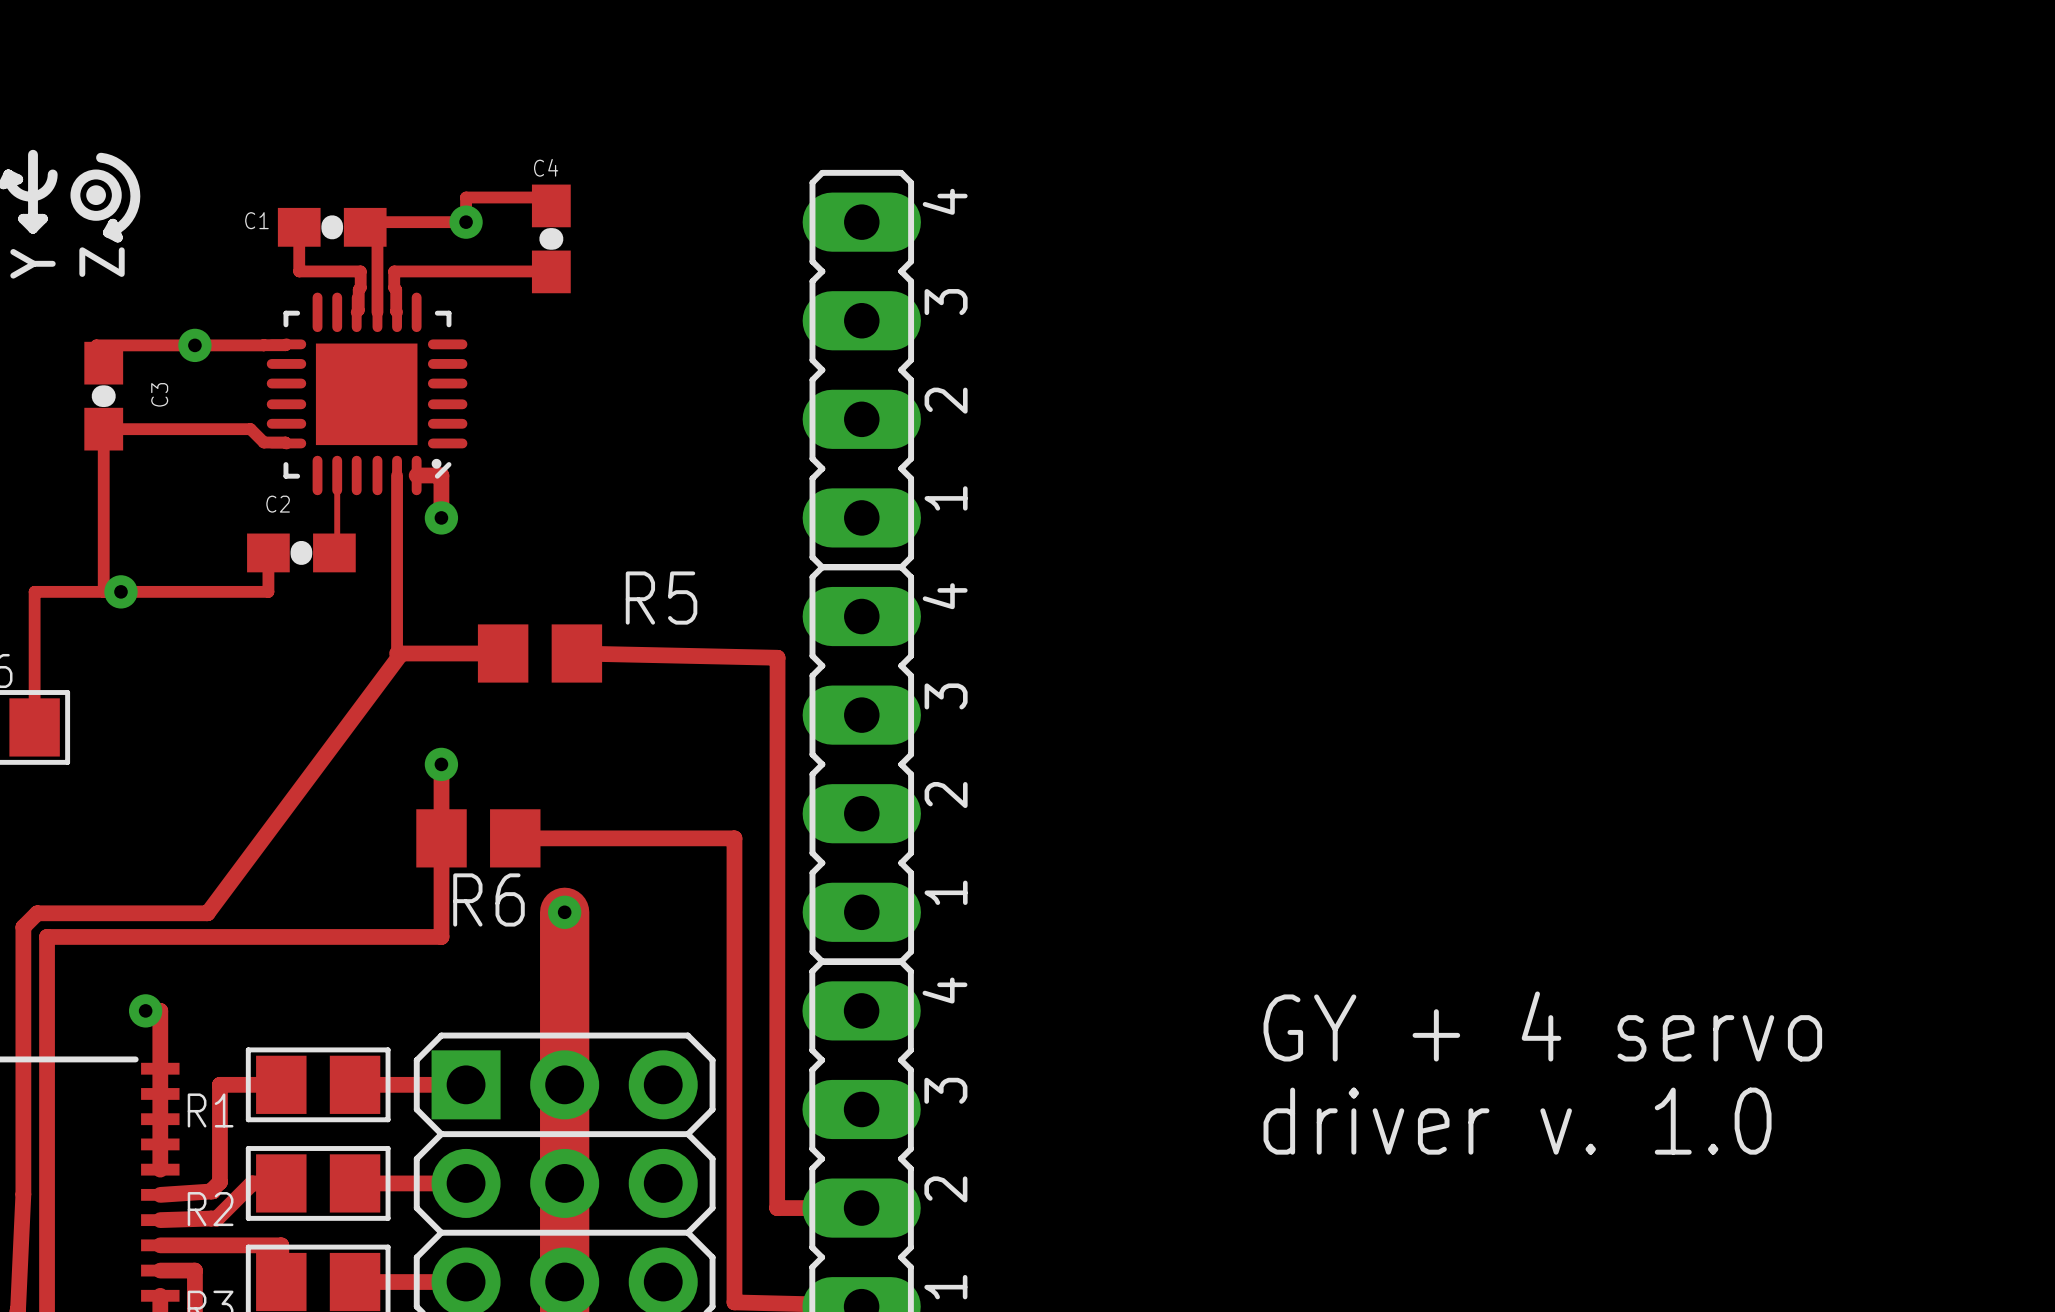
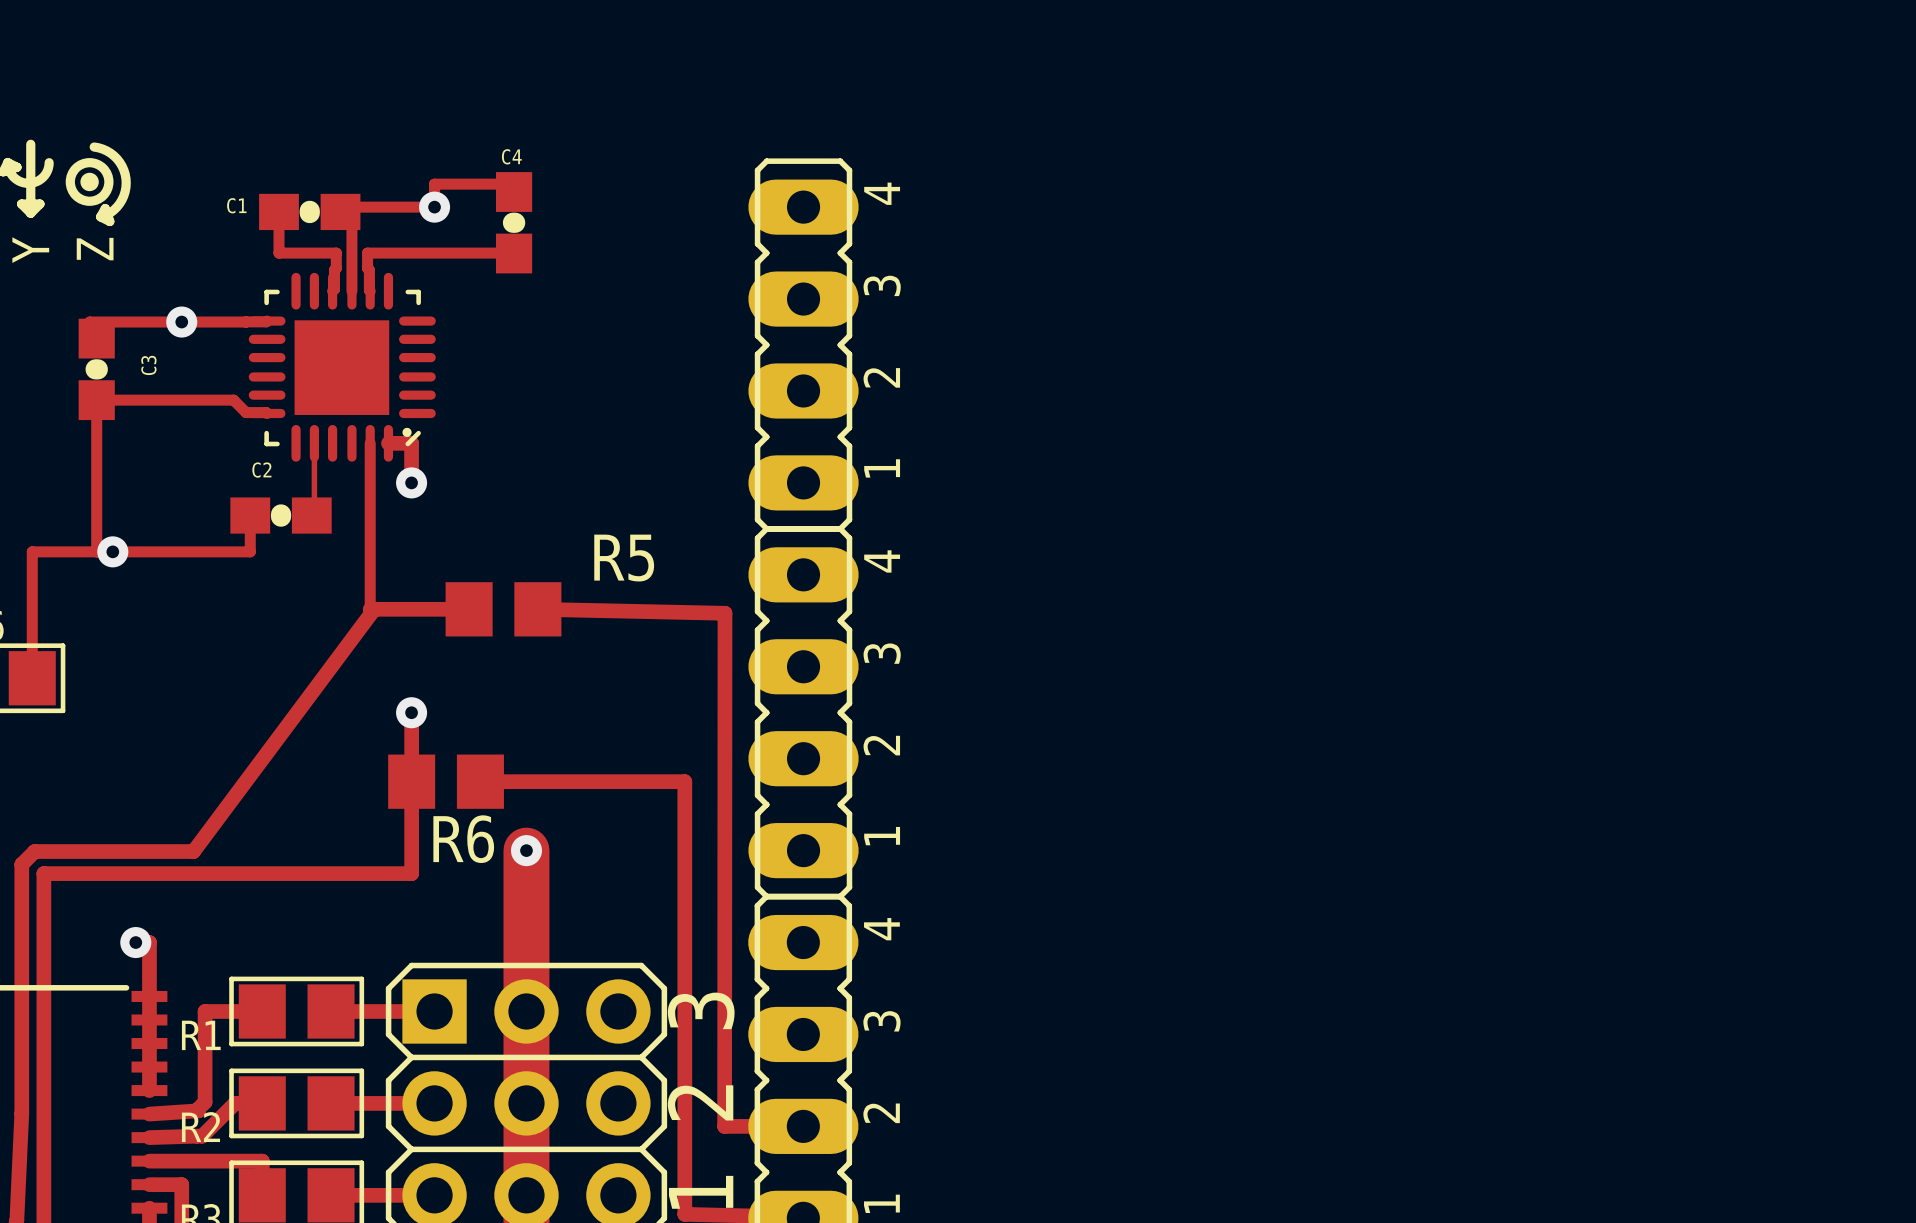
text: GY + 4 servo (1542, 1026) -> none
text: none -> 3 (701, 1010)
text: driver v. 1.0 (1517, 1121) -> none
text: none -> 2 (700, 1102)
text: none -> 1 (701, 1192)

